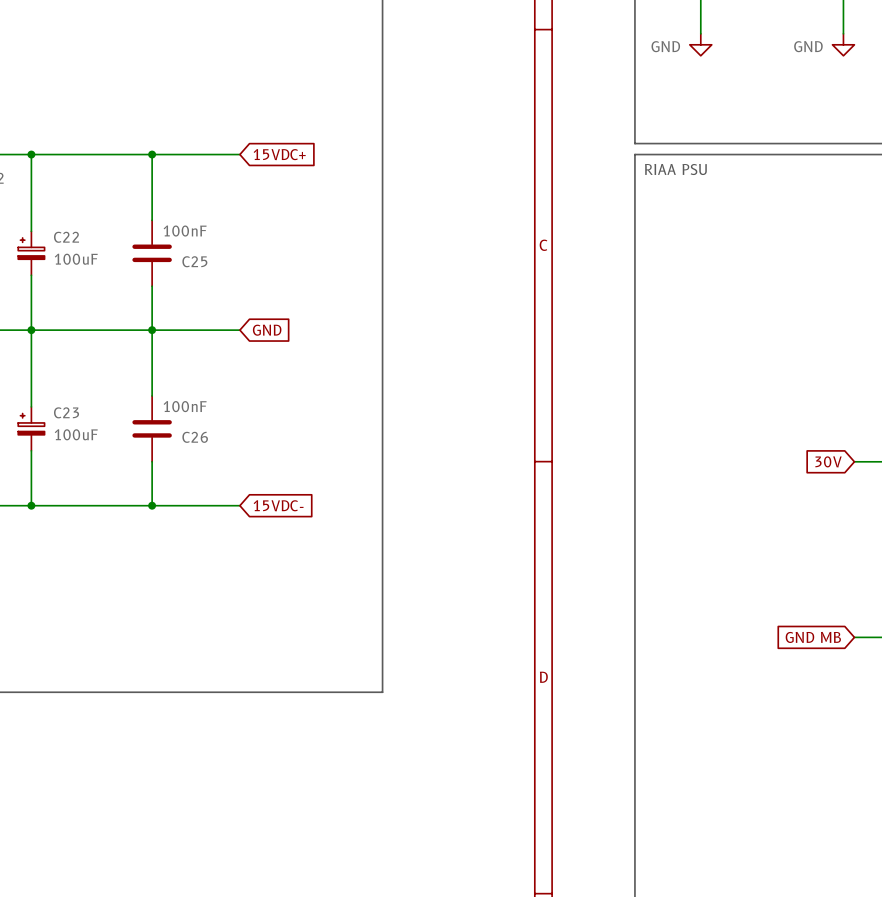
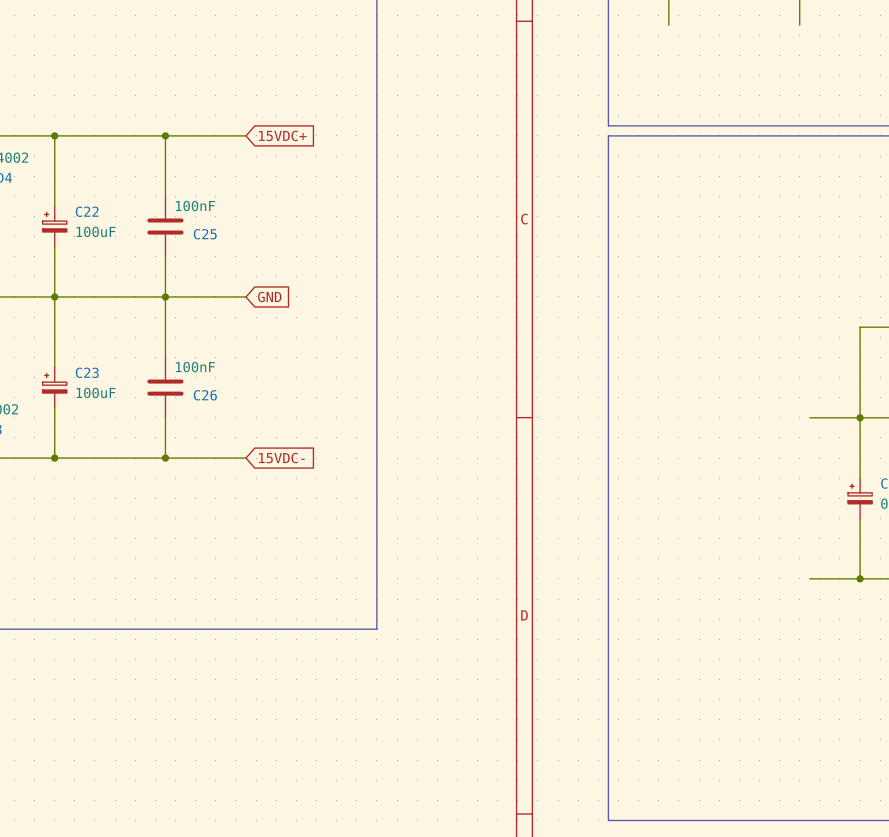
power symbol: GND (700, 44) -> none
power symbol: GND (843, 44) -> none
text: RIAA PSU (675, 169) -> none
global label: 30V (828, 461) -> none
global label: GND MB (813, 637) -> none

